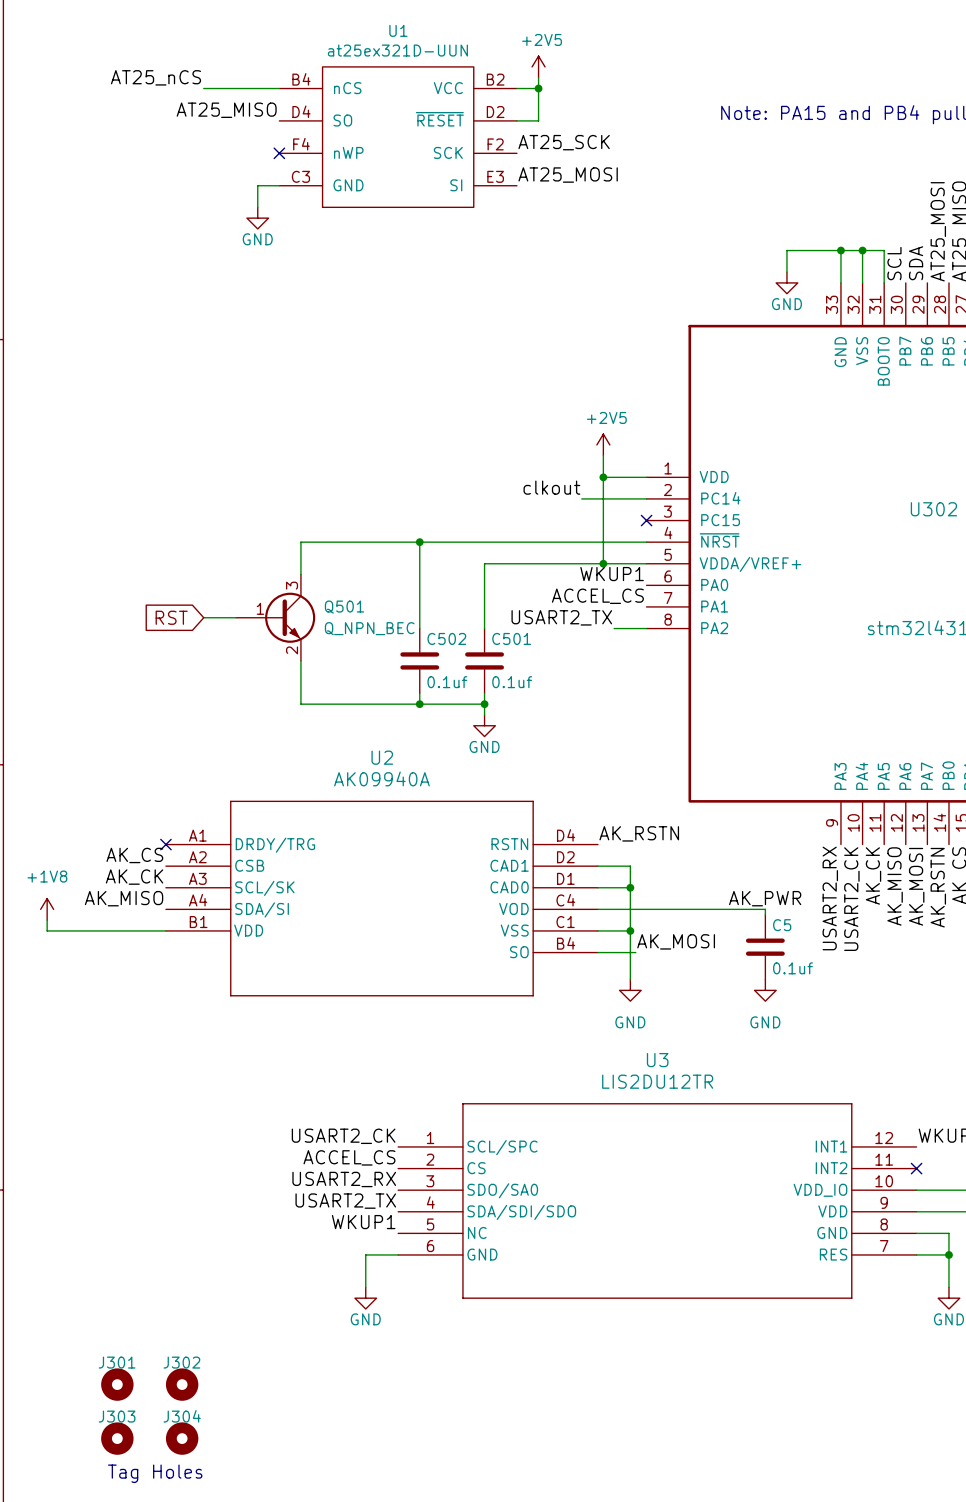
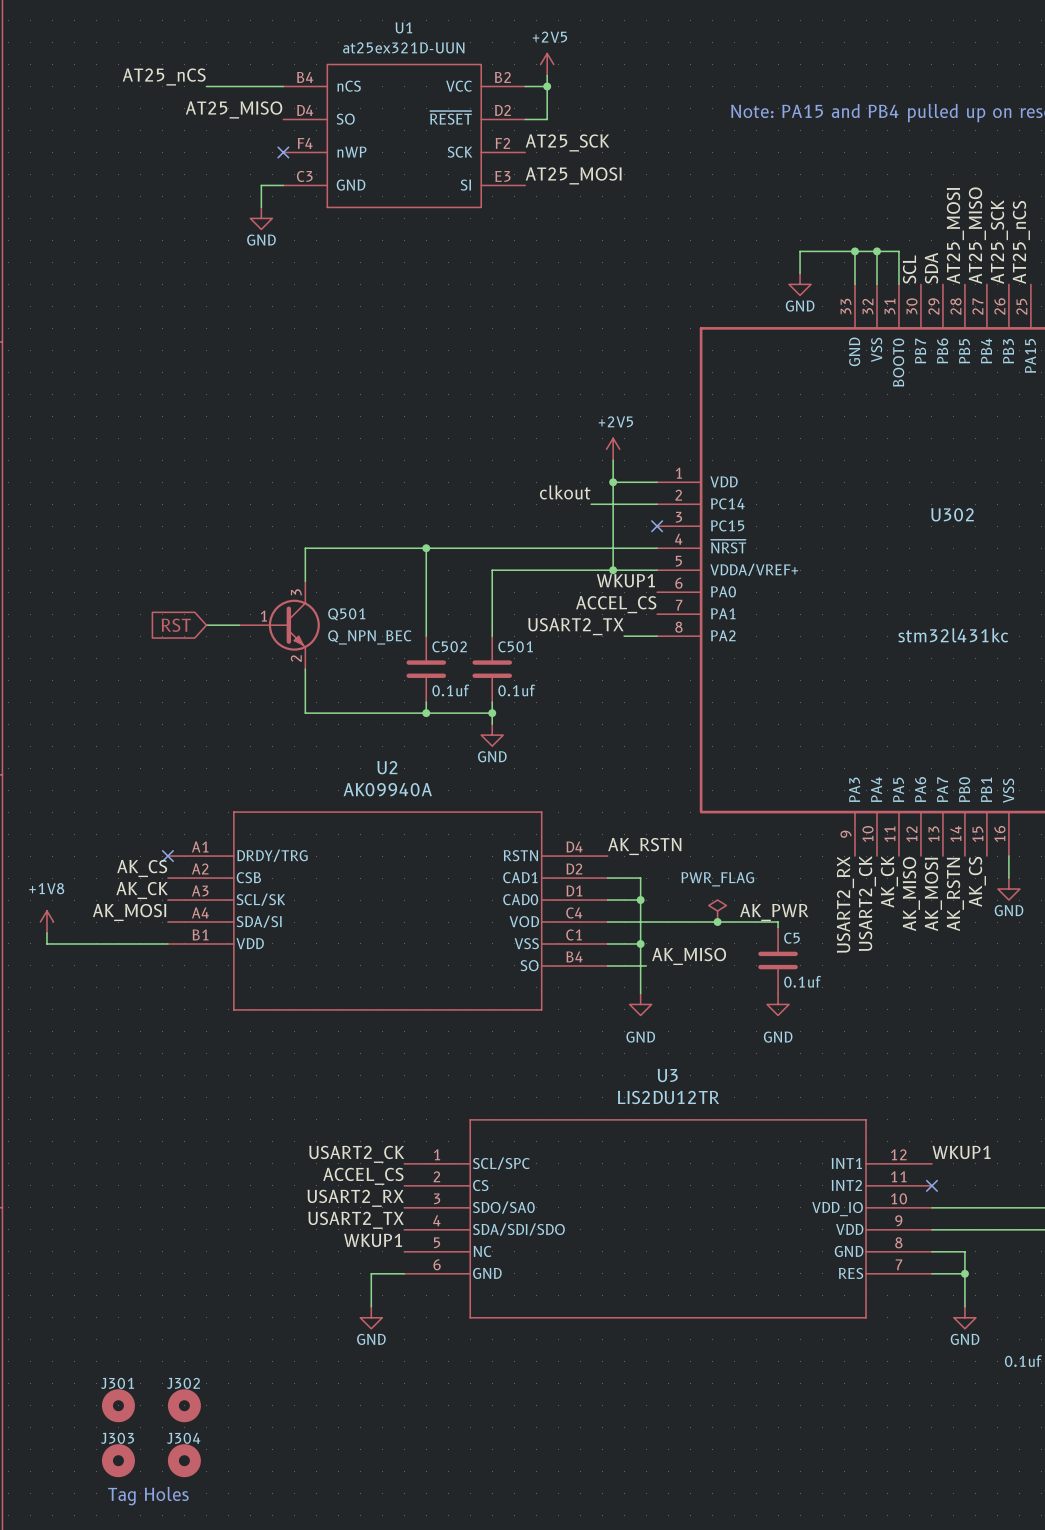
label: AK_MISO (124, 898) -> AK_MOSI (129, 912)
power symbol: none -> PWR_FLAG (717, 911)
junction: none -> (717, 922)
label: AK_MOSI (676, 941) -> AK_MISO (689, 956)

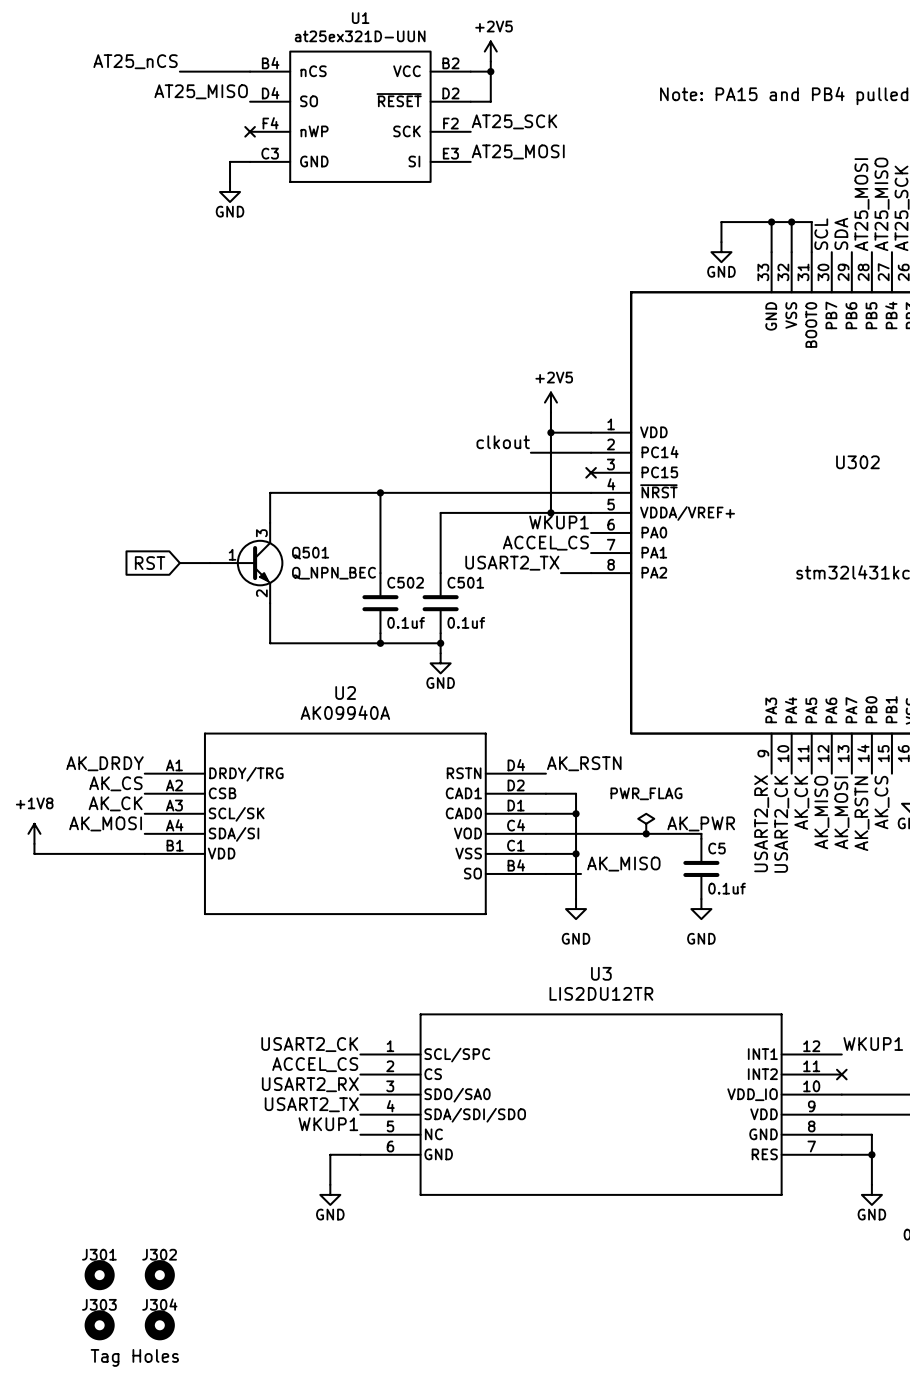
label: none -> AK_DRDY (105, 763)
no-connect mark: (167, 856) -> none

